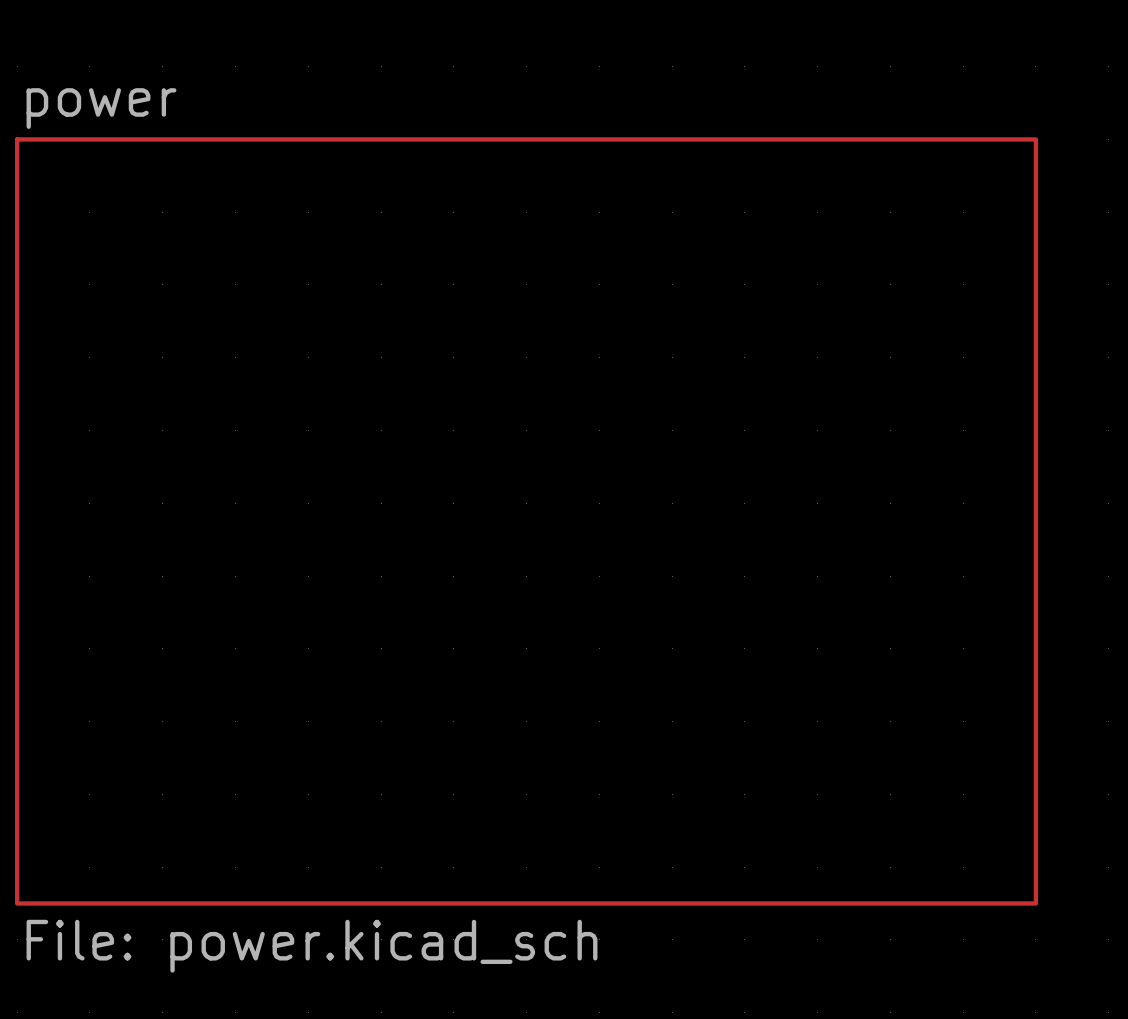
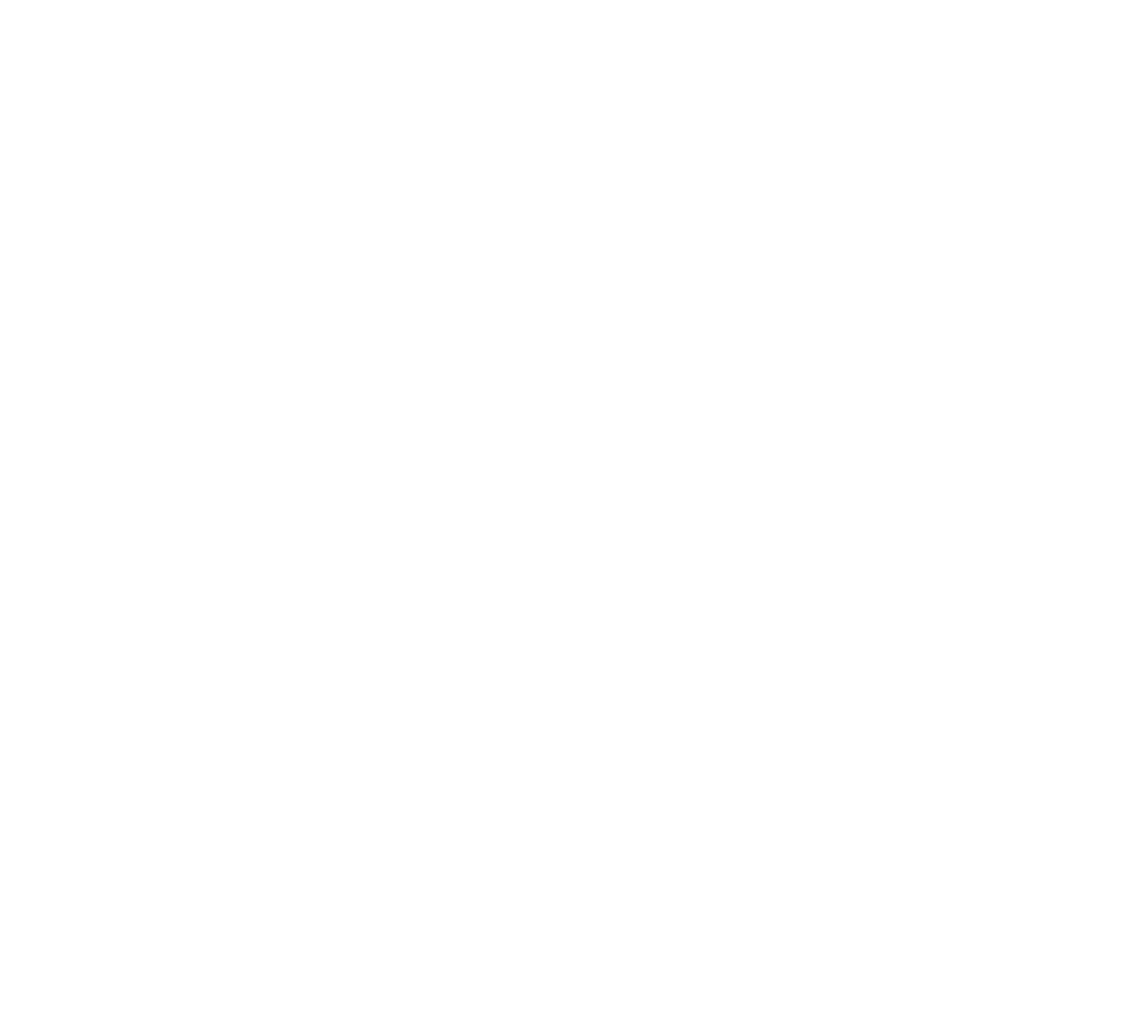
sheet power: File: power.kicad_sch (526, 521) -> none

